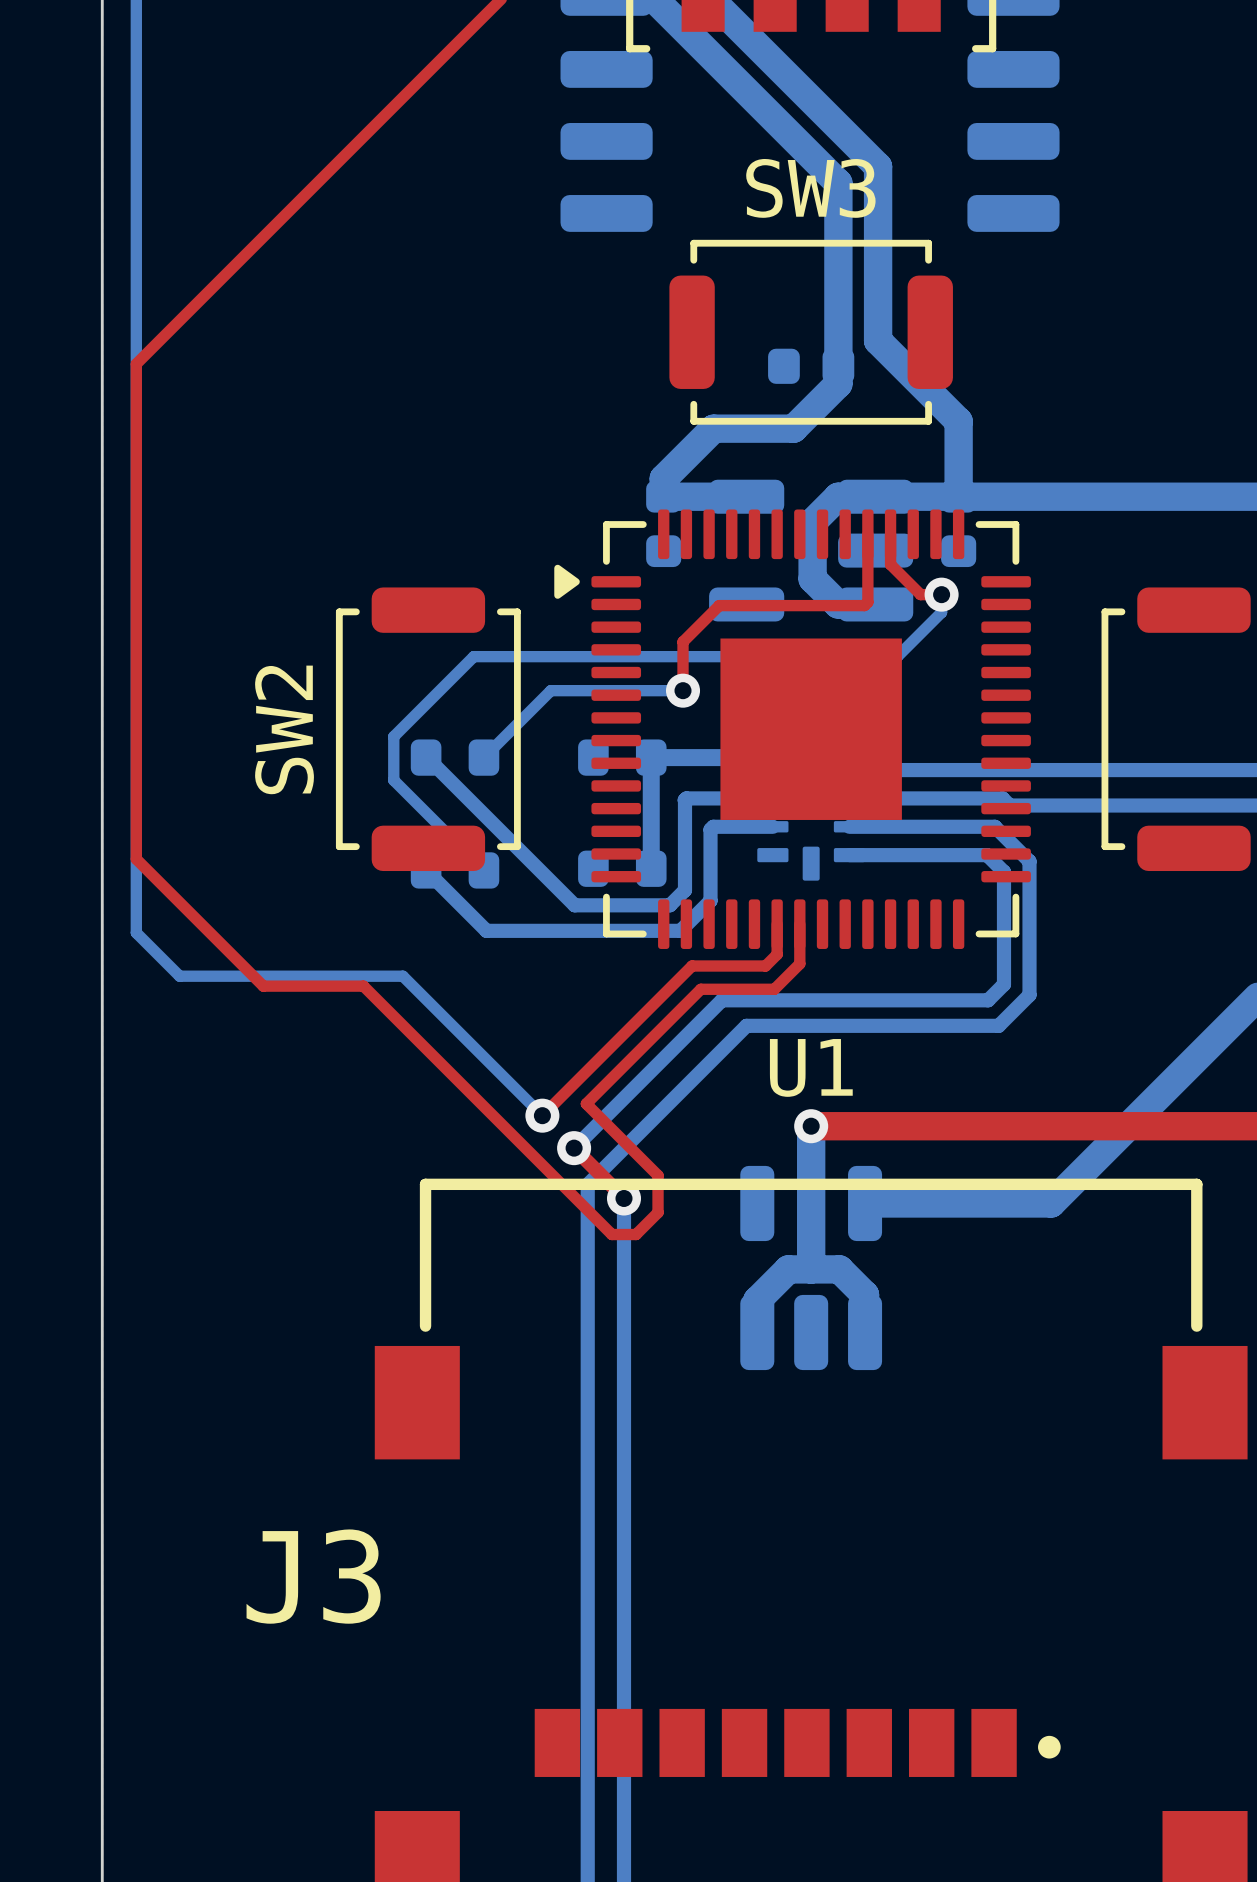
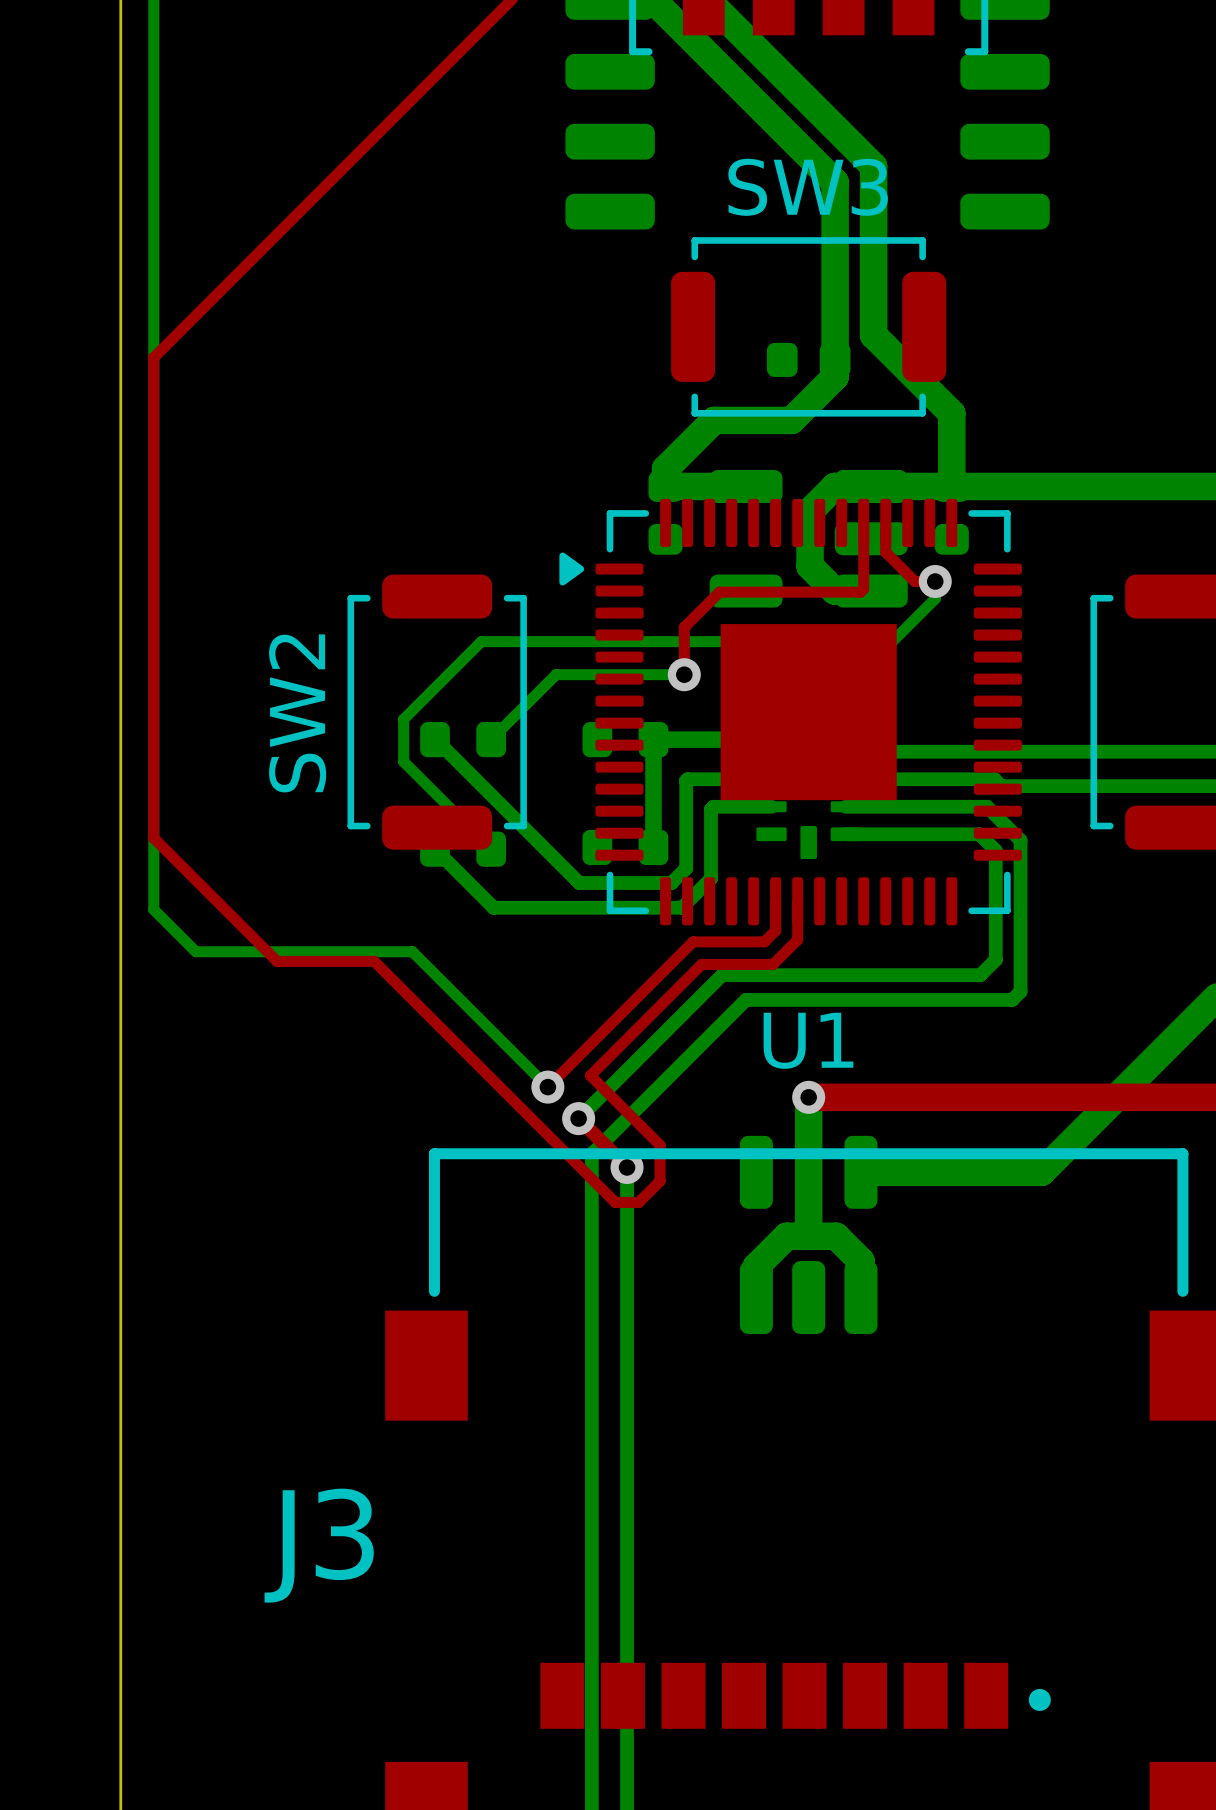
bottom track: (1029, 995) (998, 1025) -> (1020, 970) (1020, 991) (1012, 999) (990, 999)

